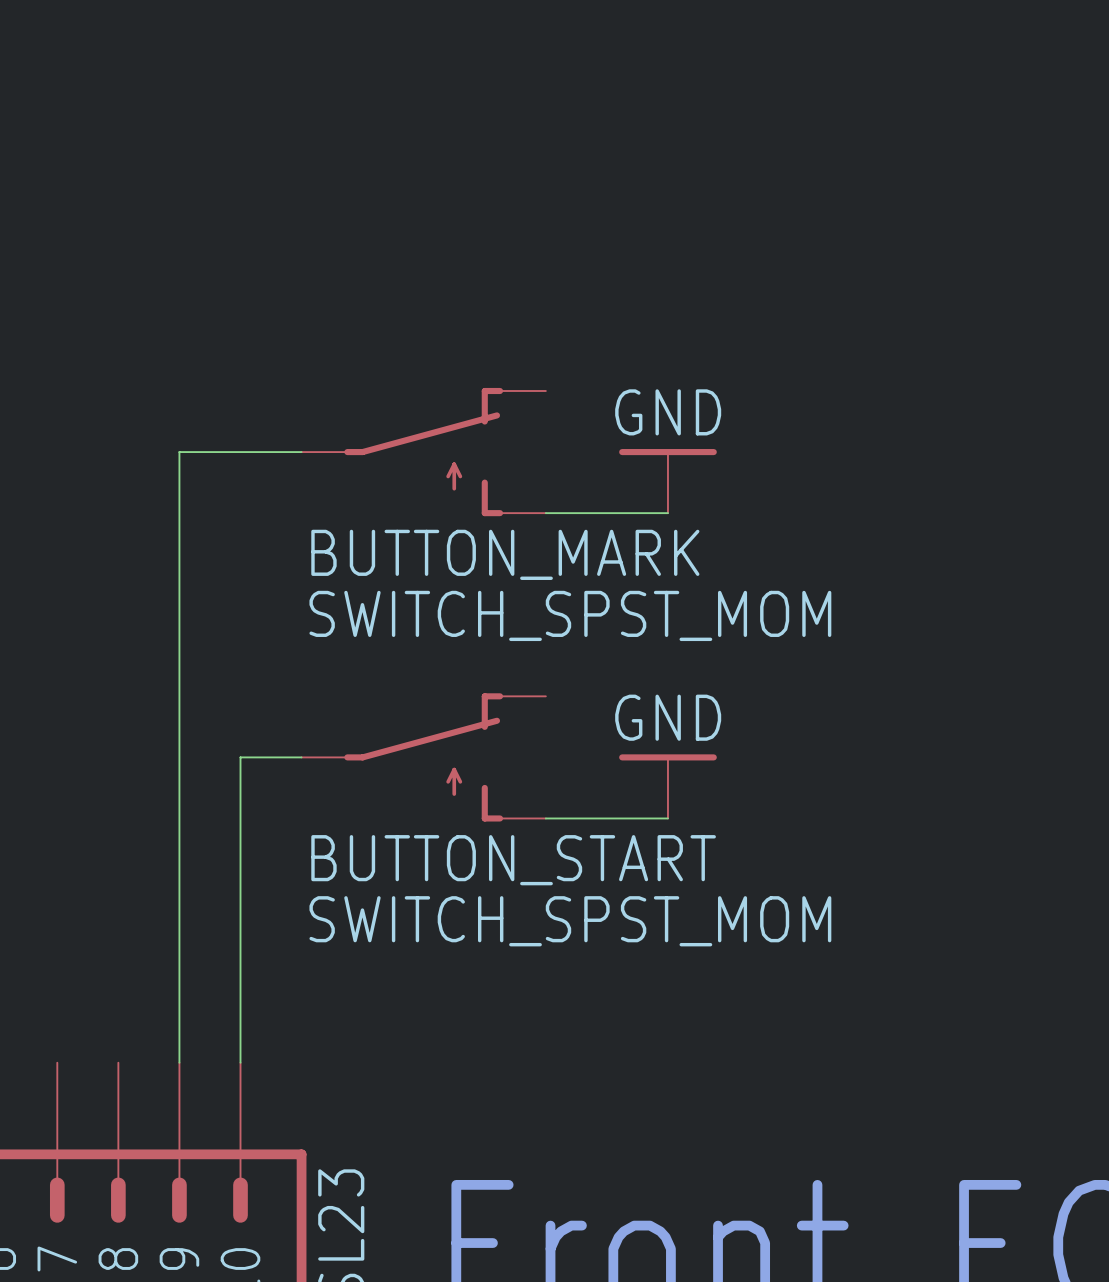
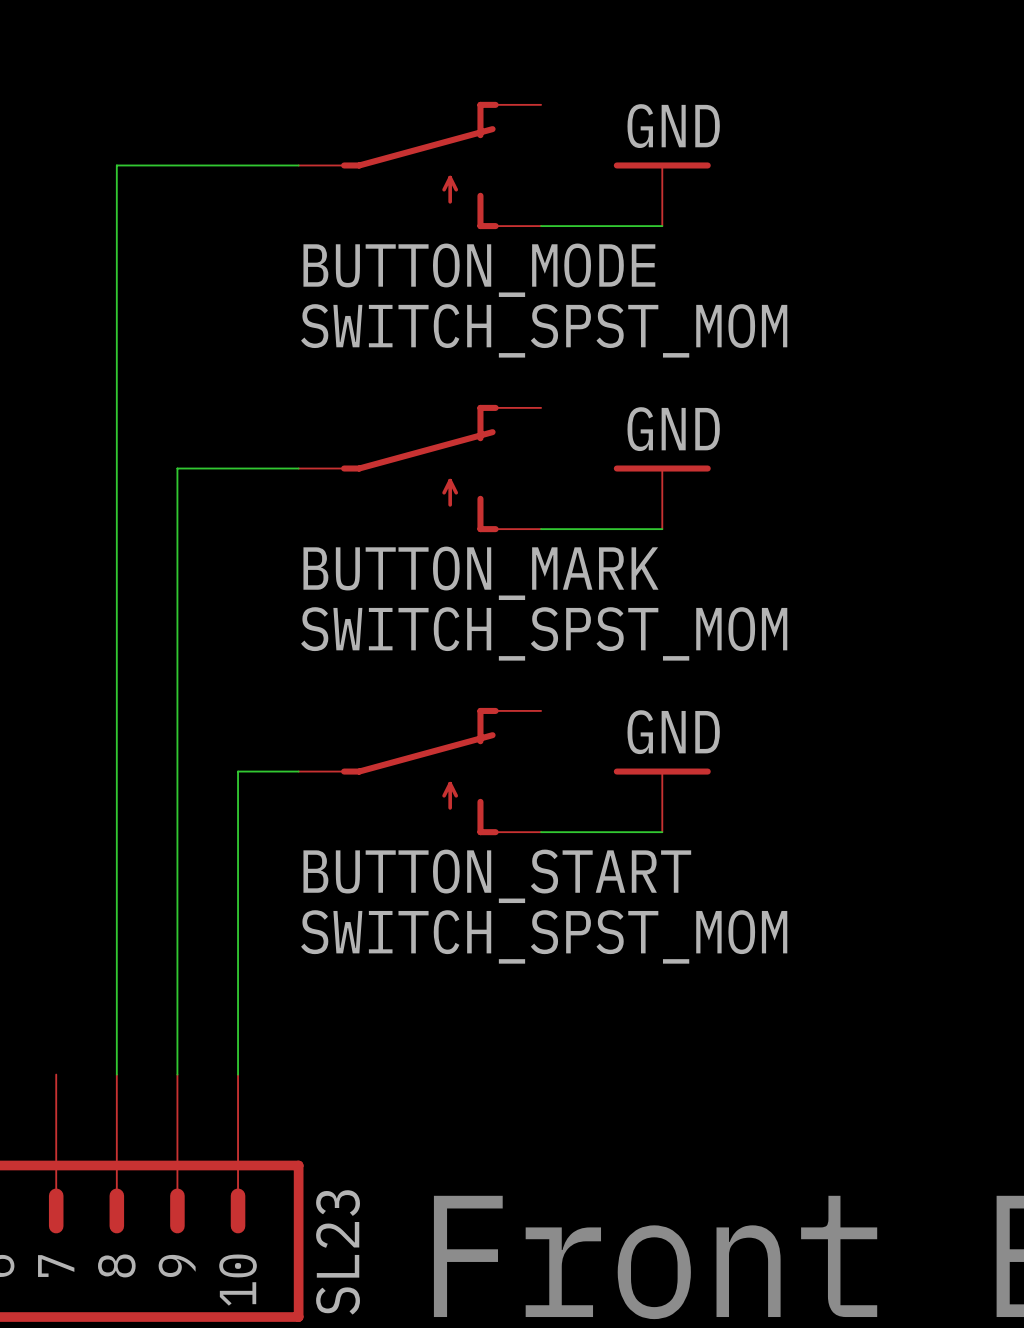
wire: none -> (298, 165) (116, 165) (116, 1074)
BUTTON_MODE: none -> SWITCH_SPST_MOM (419, 165)
power symbol: none -> GND (662, 194)
wire: none -> (541, 226) (662, 226)

